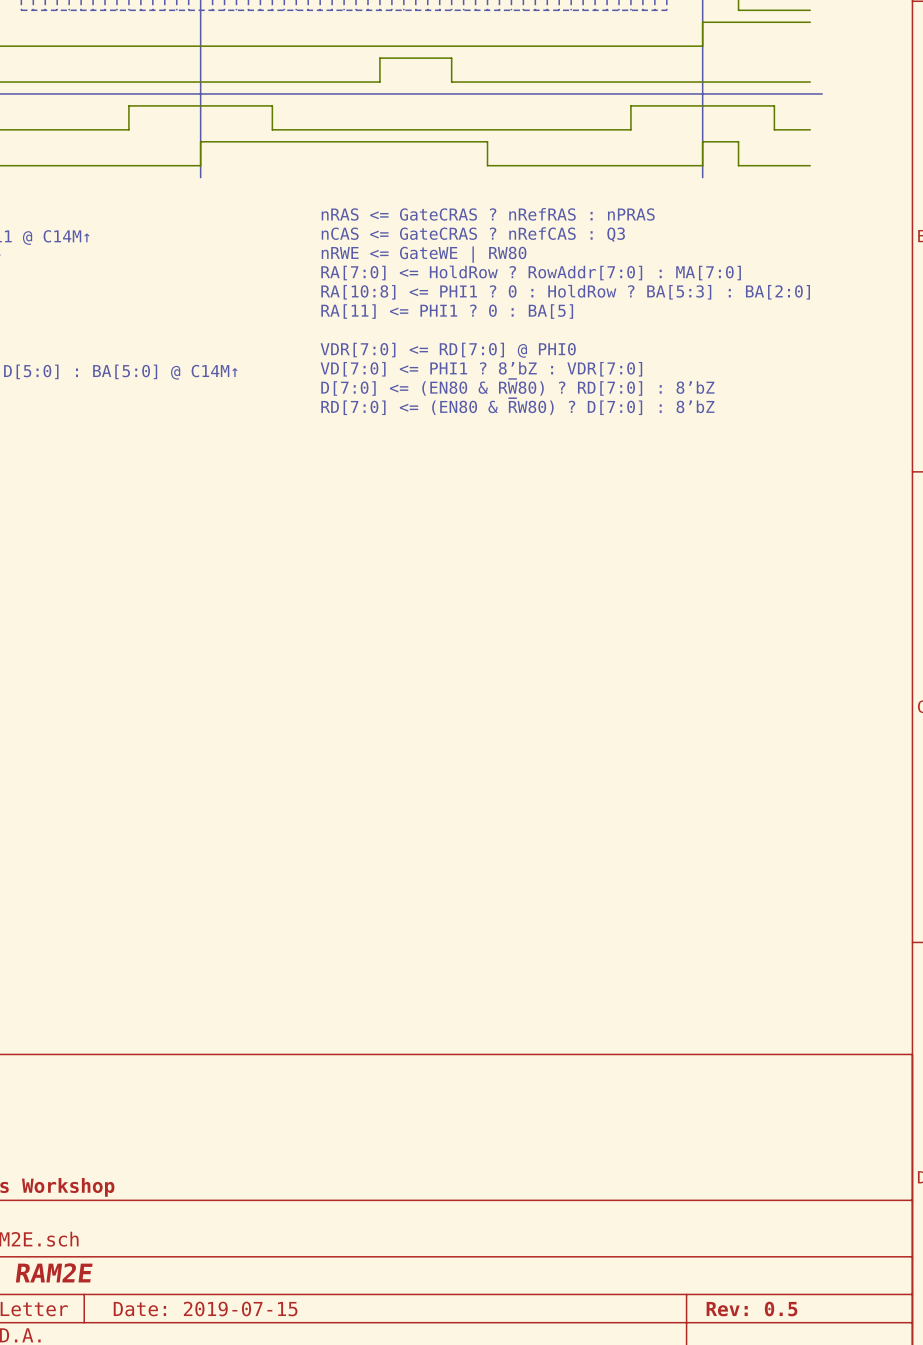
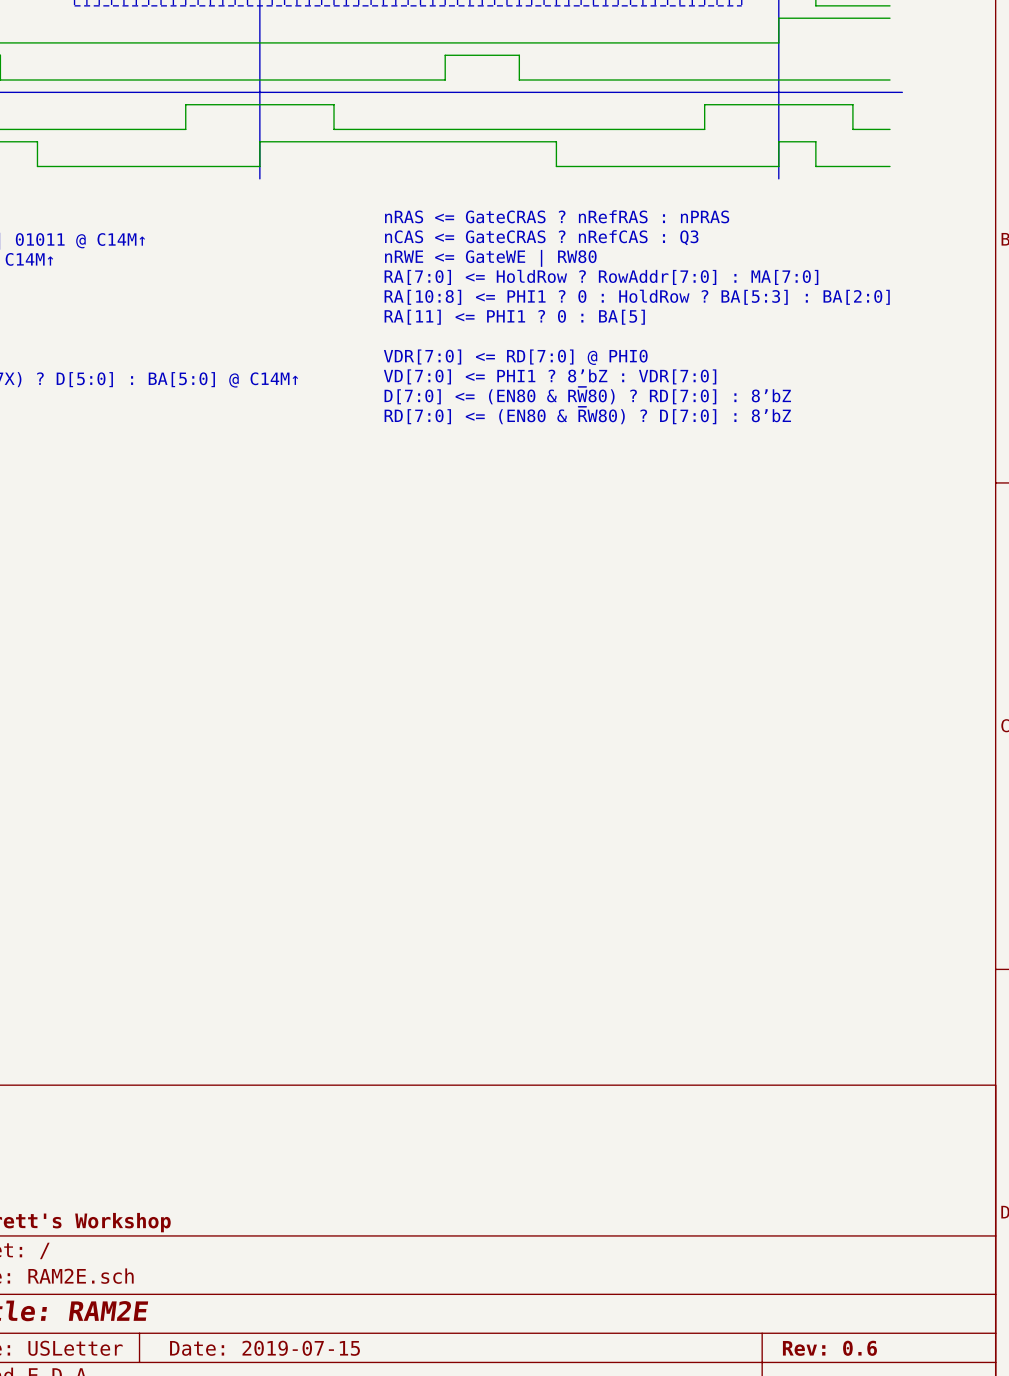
title block: Rev: 0.5 (752, 1308) -> Rev: 0.6 (829, 1348)

